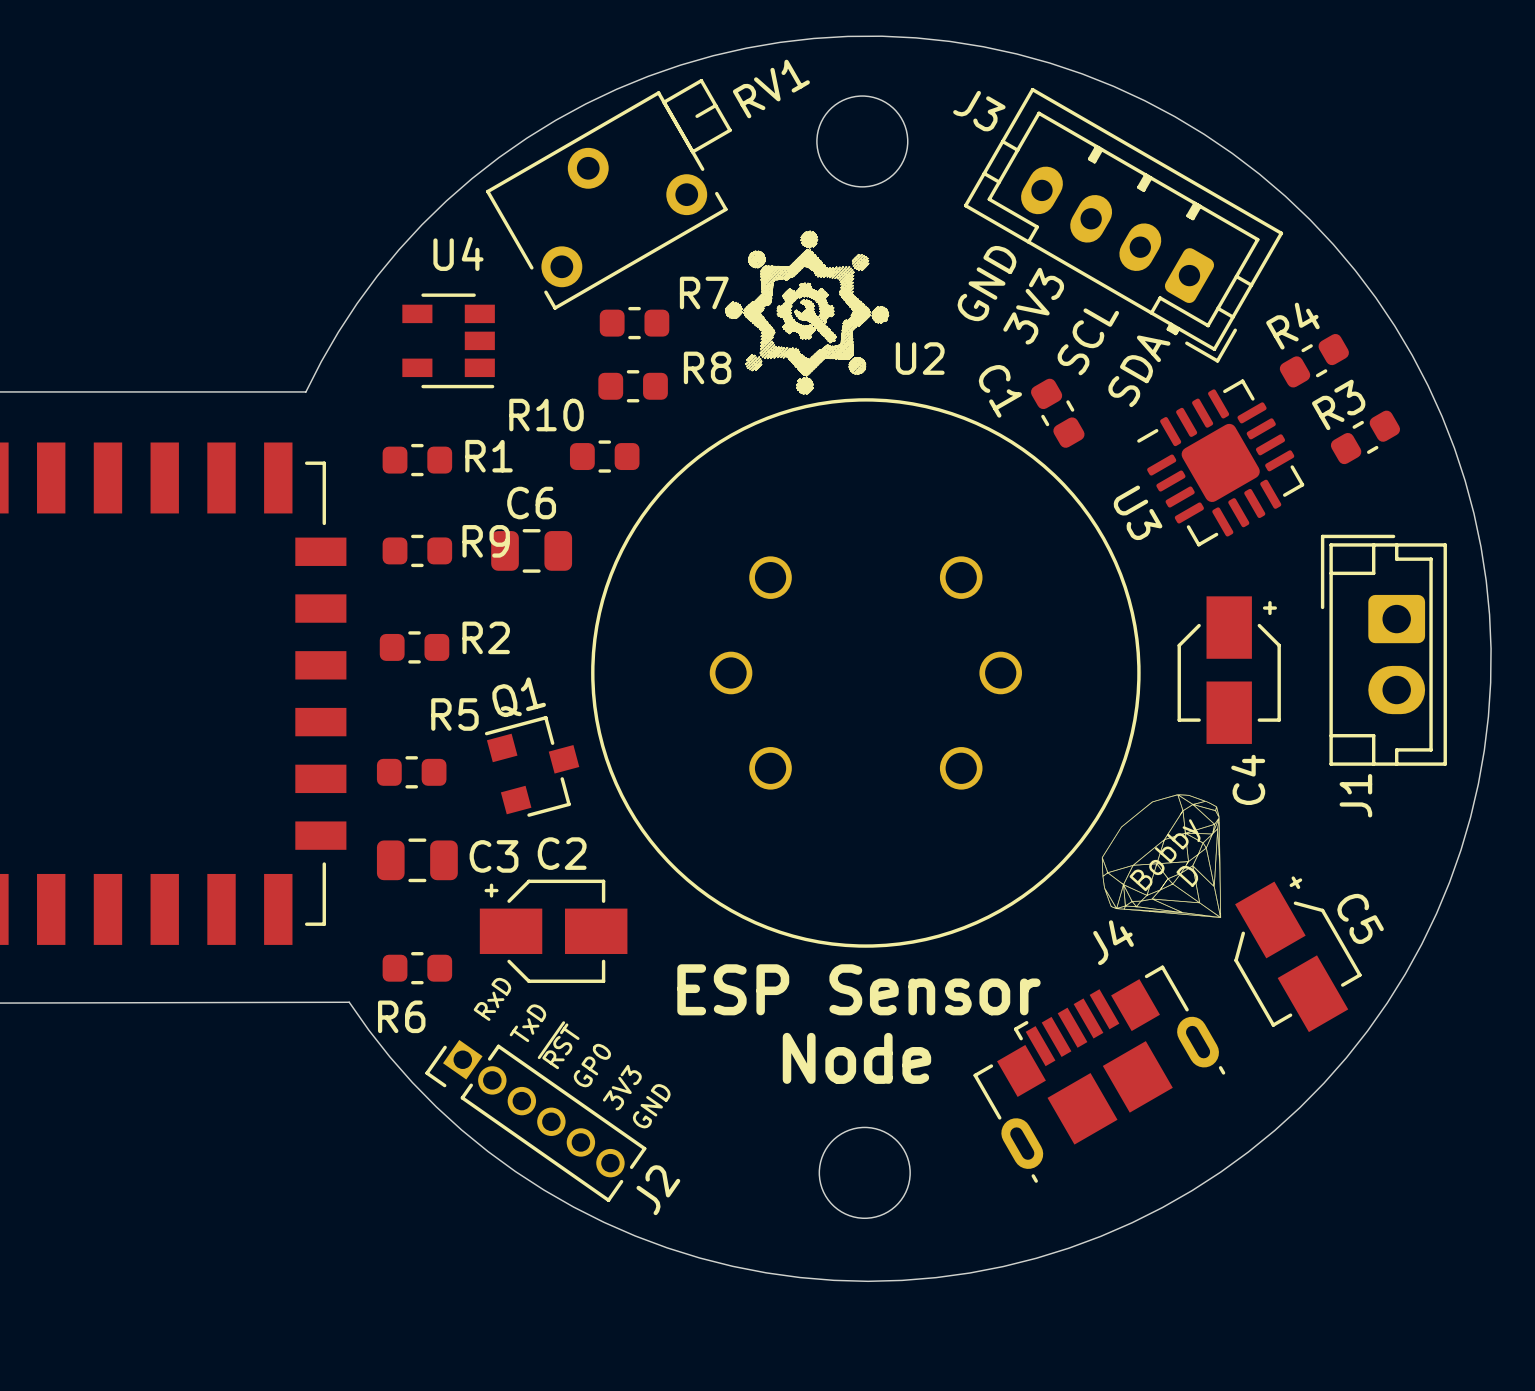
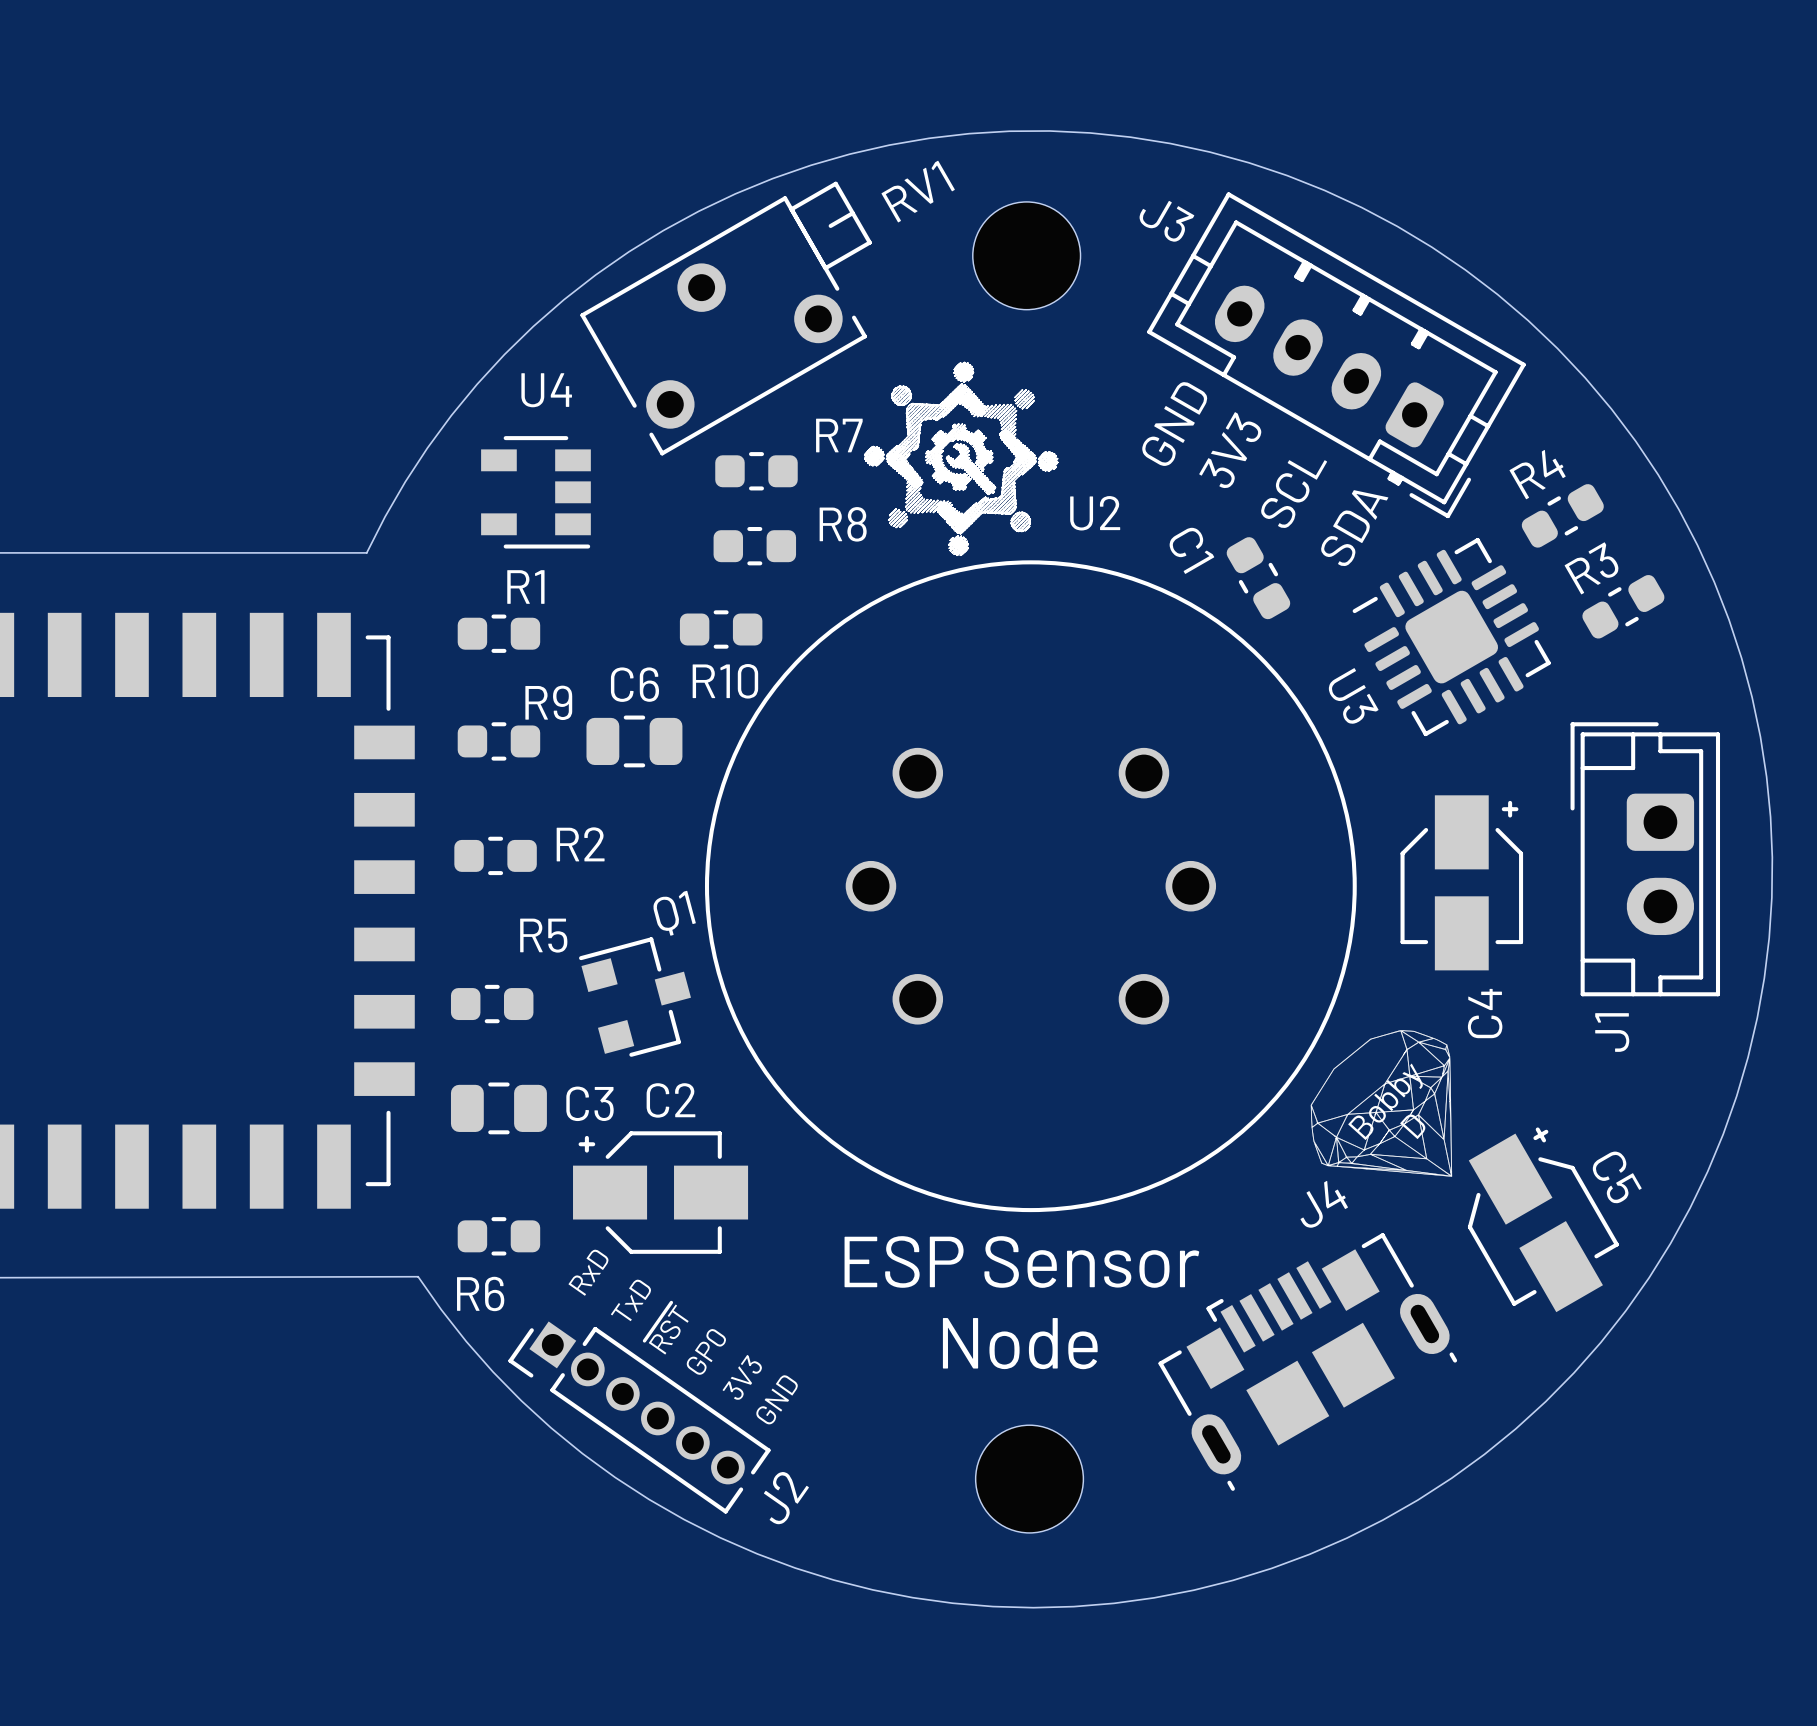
R10 name position: R10 (546, 415) -> R10 (725, 681)
R1 name position: R1 (489, 456) -> R1 (525, 587)
R9 name position: R9 (486, 541) -> R9 (548, 702)
Q1 name position: Q1 (519, 697) -> Q1 (674, 913)

